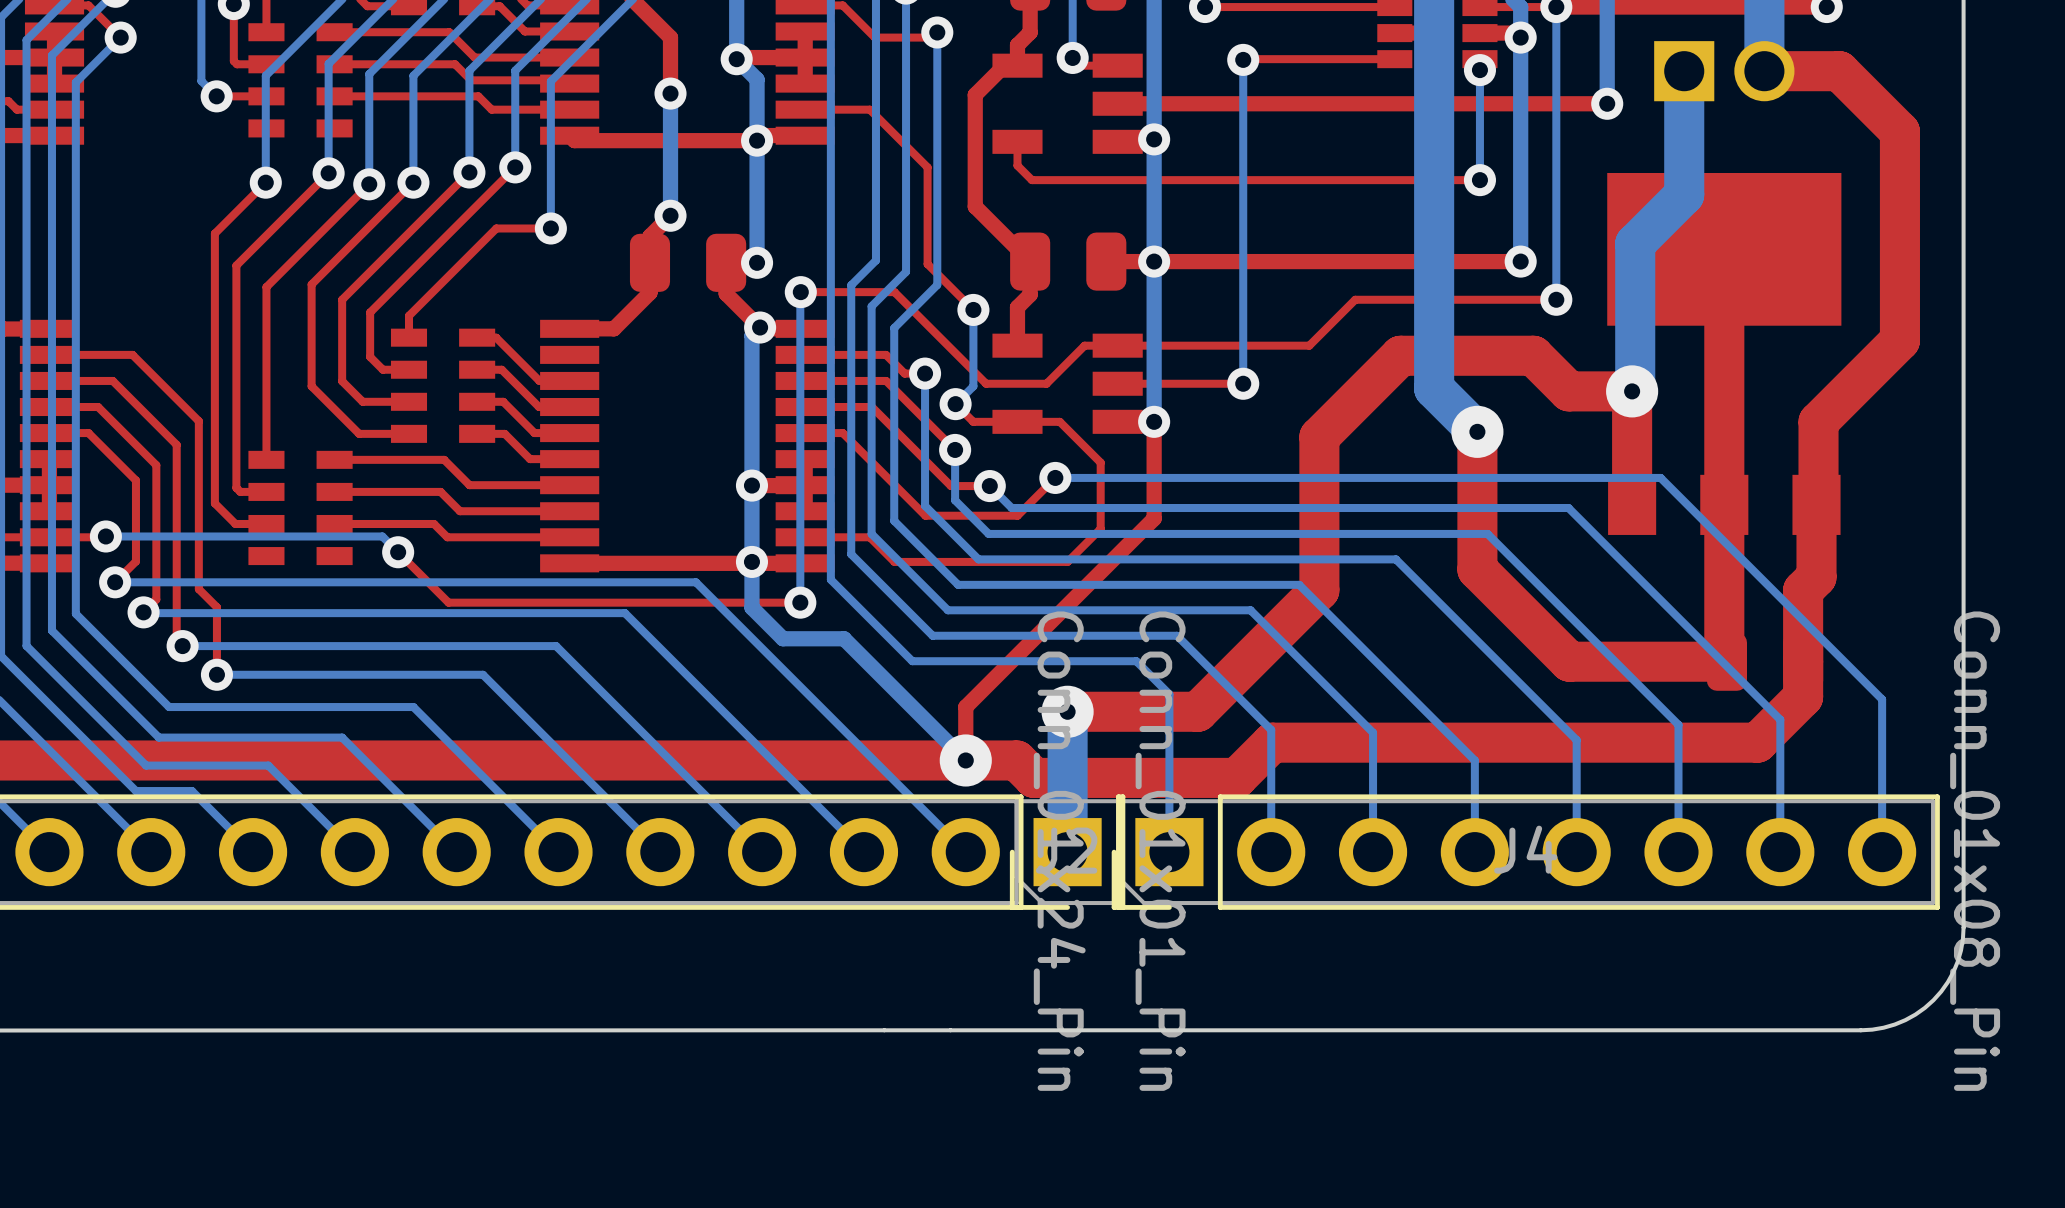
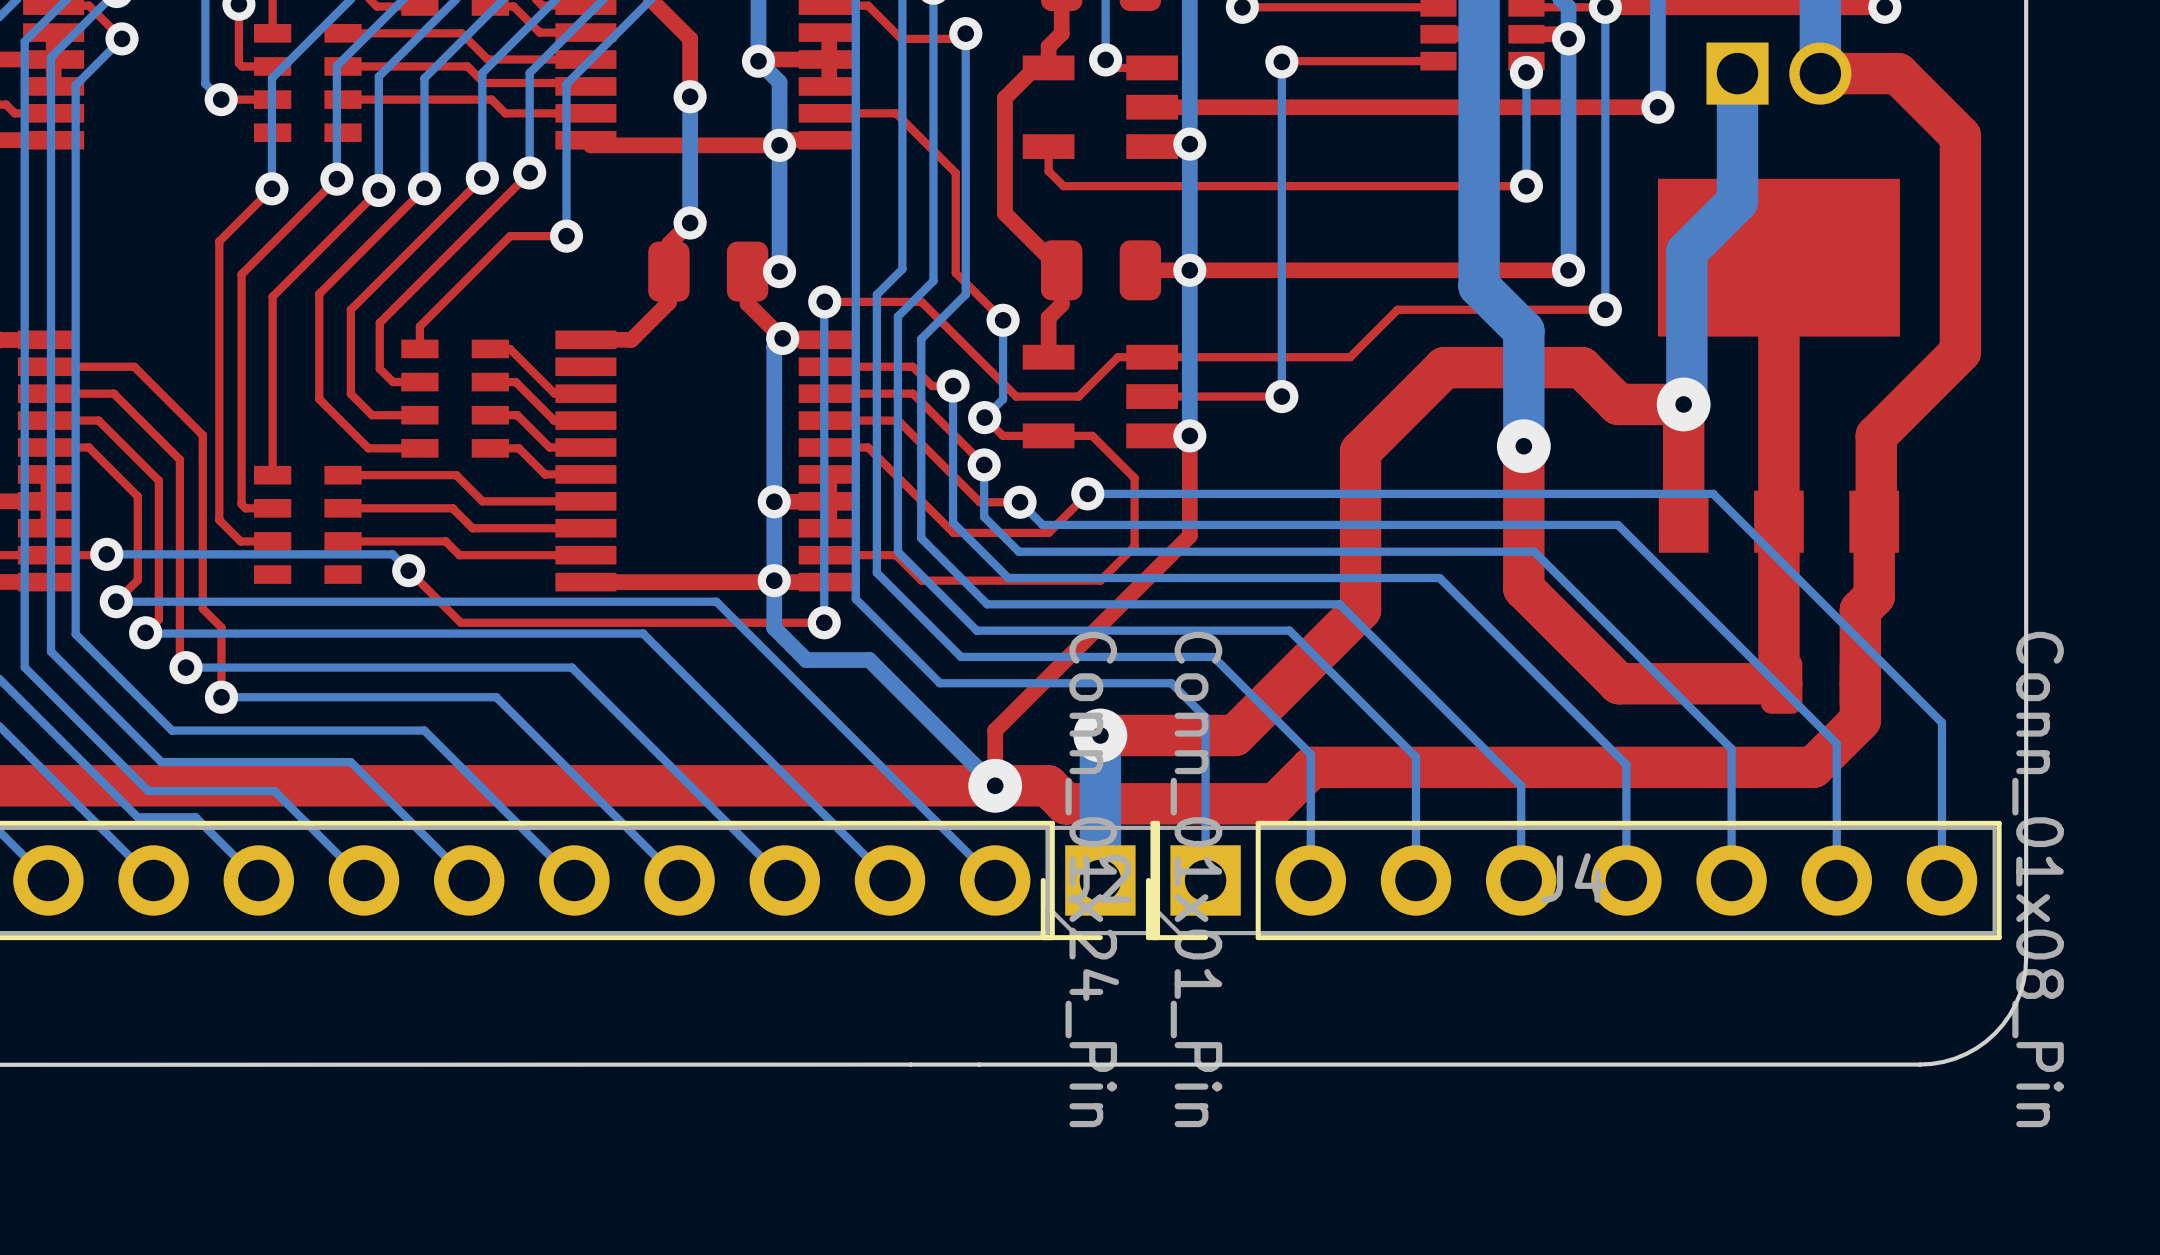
bottom track: (1434, 276) (1434, 388) (1477, 431) -> (1479, 286) (1523, 330) (1523, 446)

